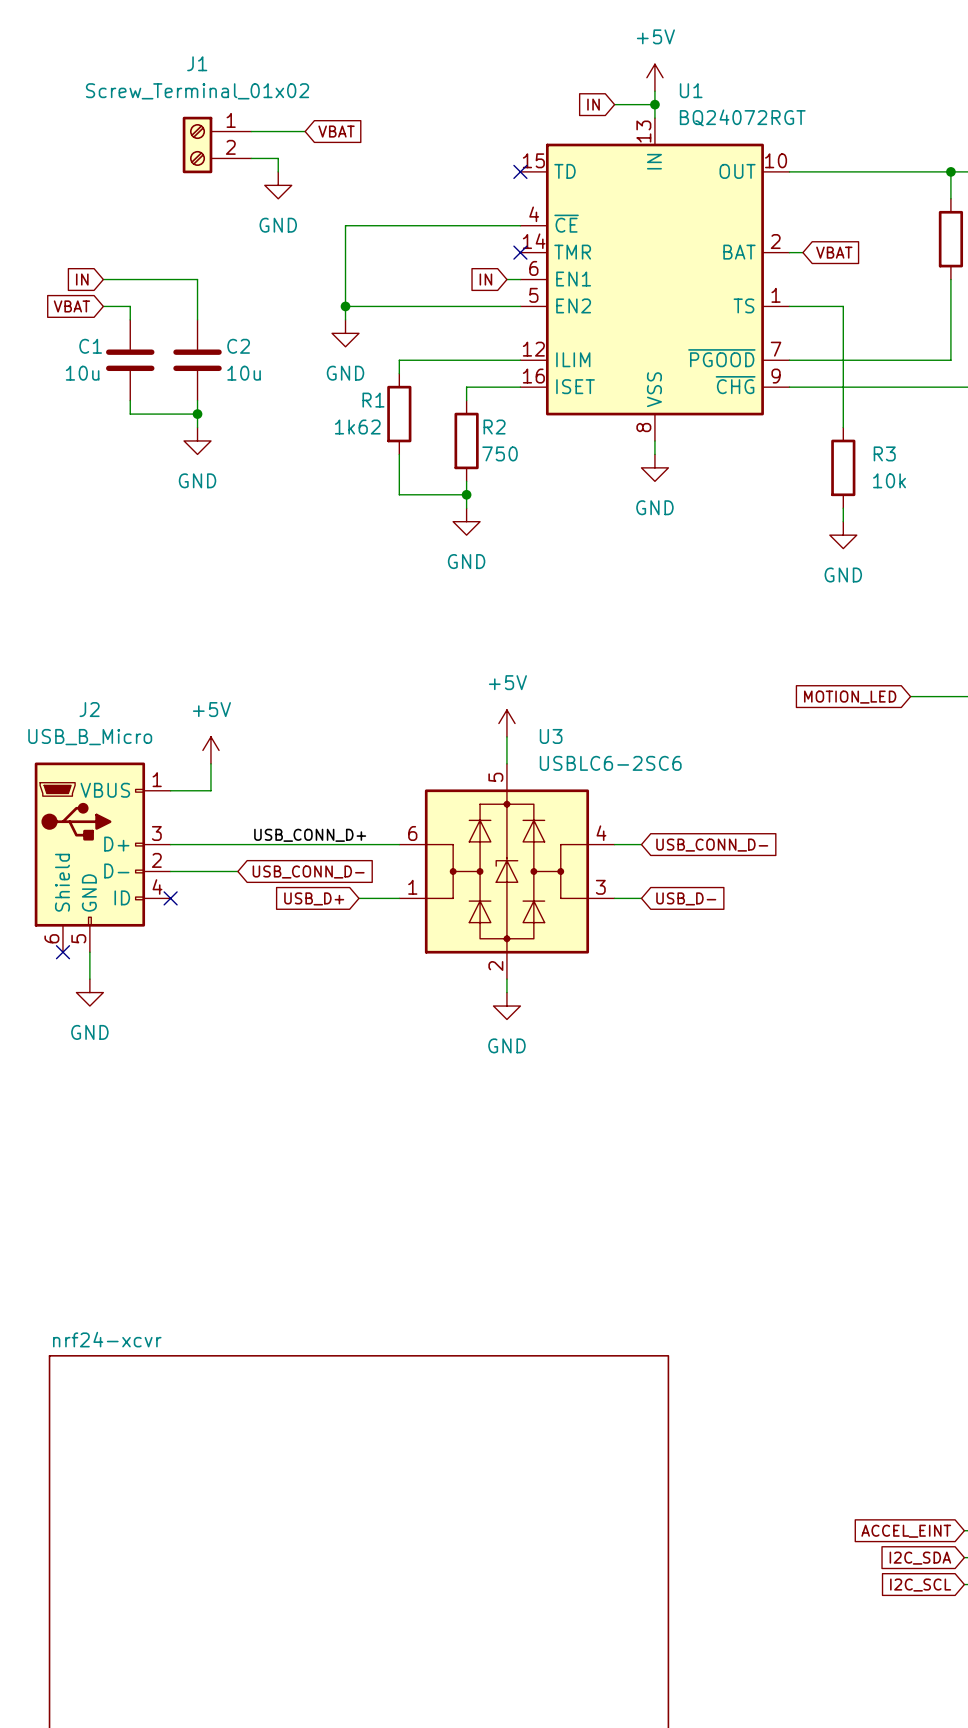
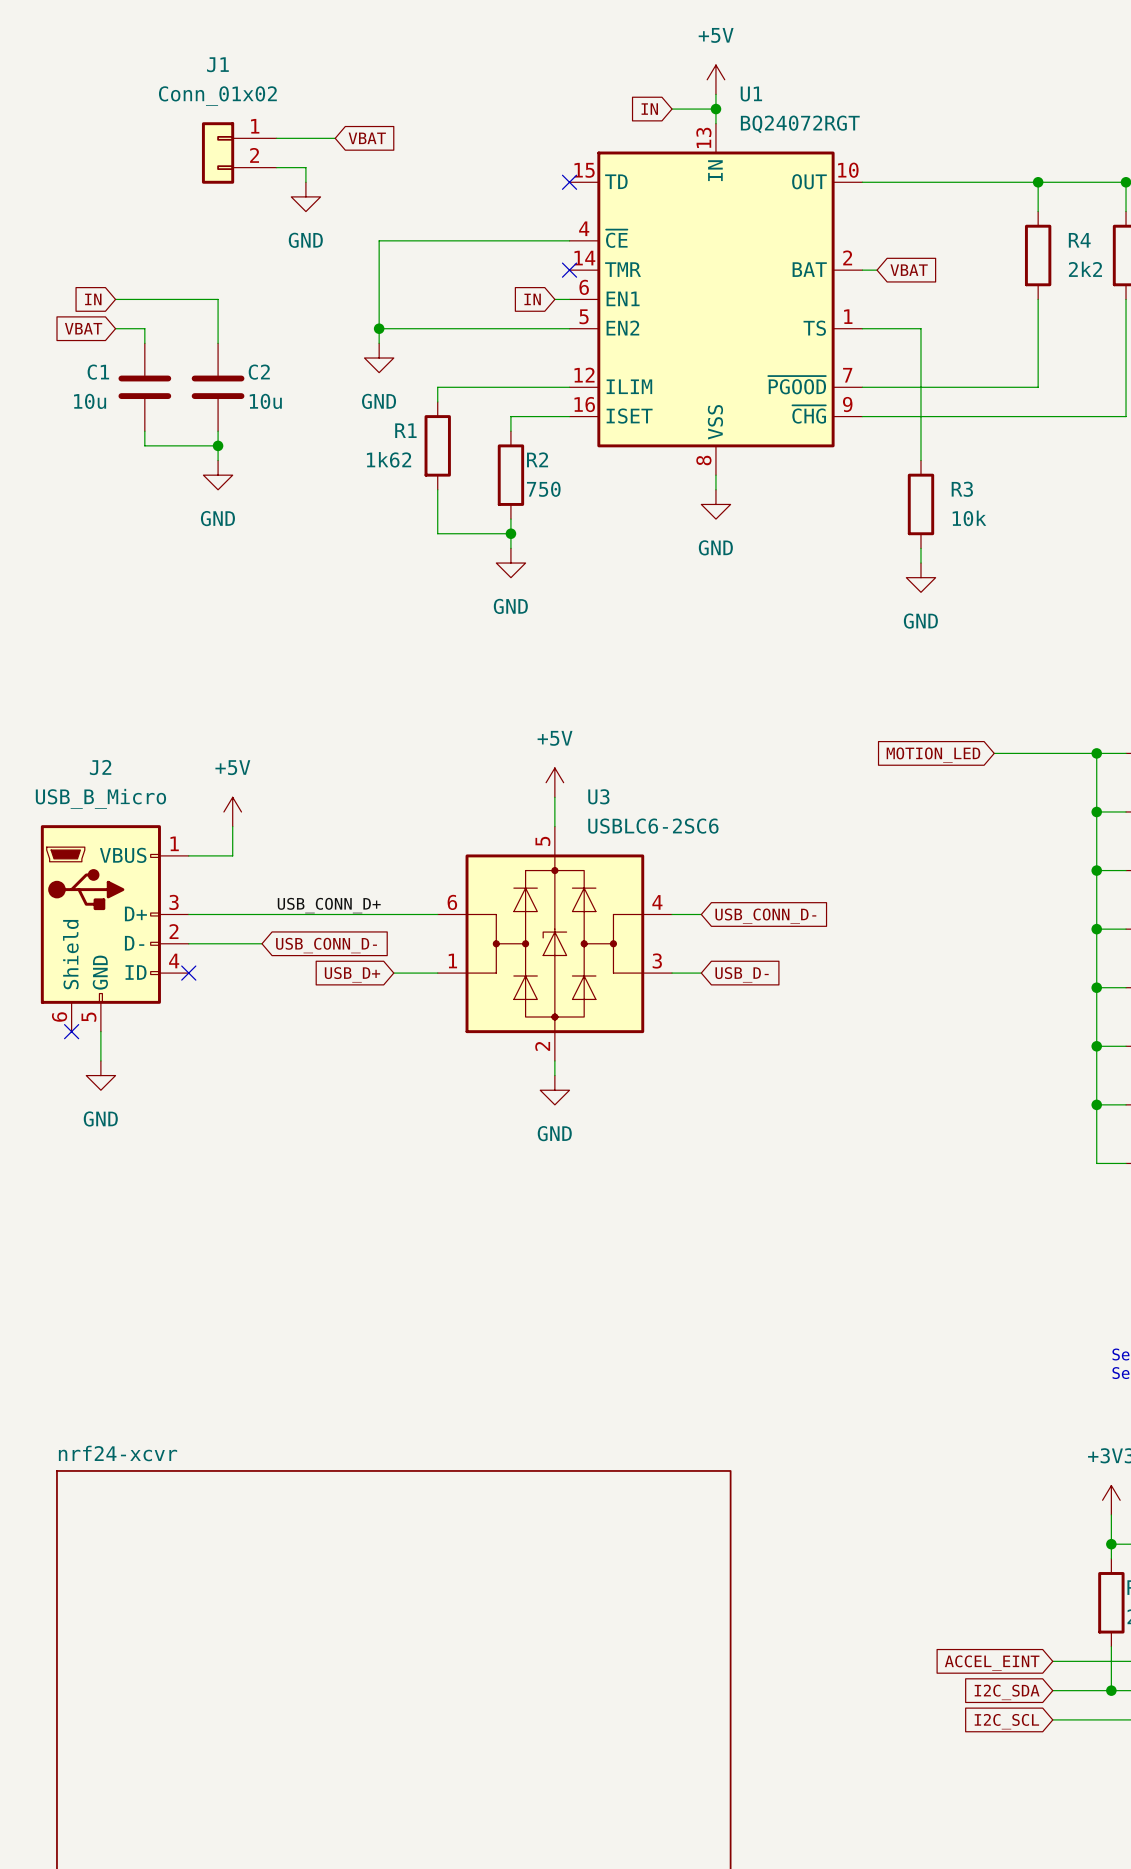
J1 value: Screw_Terminal_01x02 (197, 91) -> Conn_01x02 (217, 96)
J1 symbol: [182, 116, 252, 174] -> [201, 122, 277, 184]

